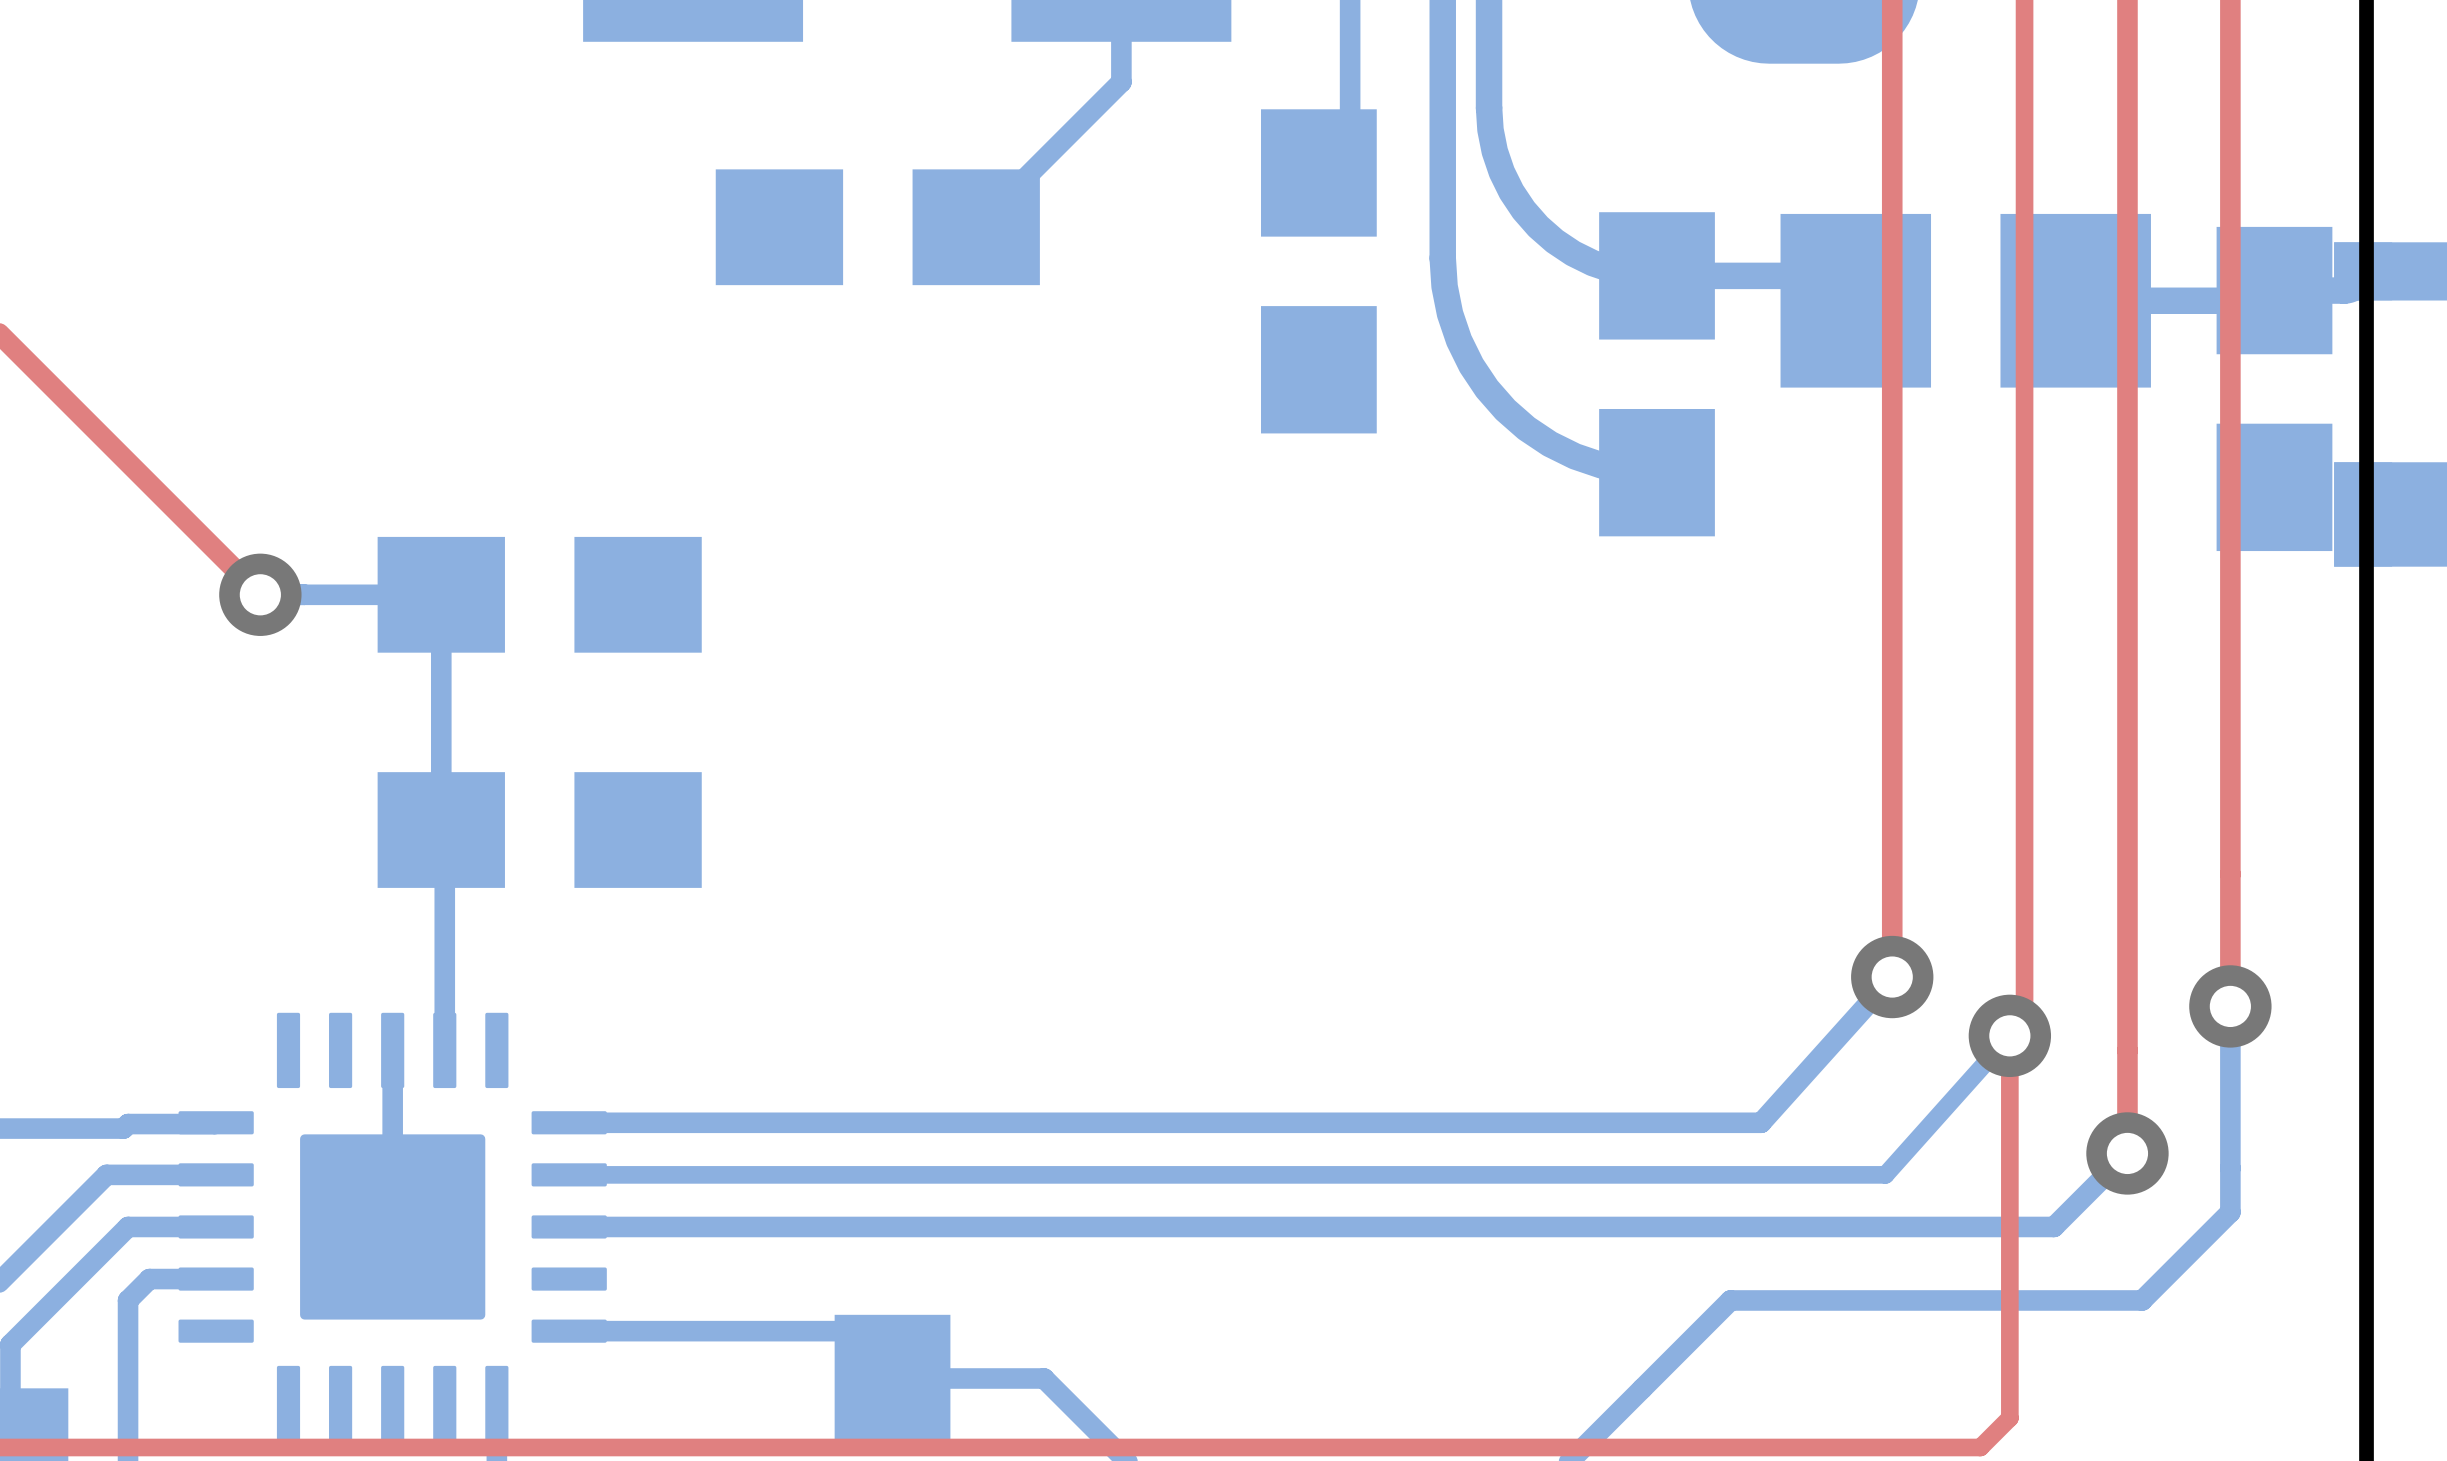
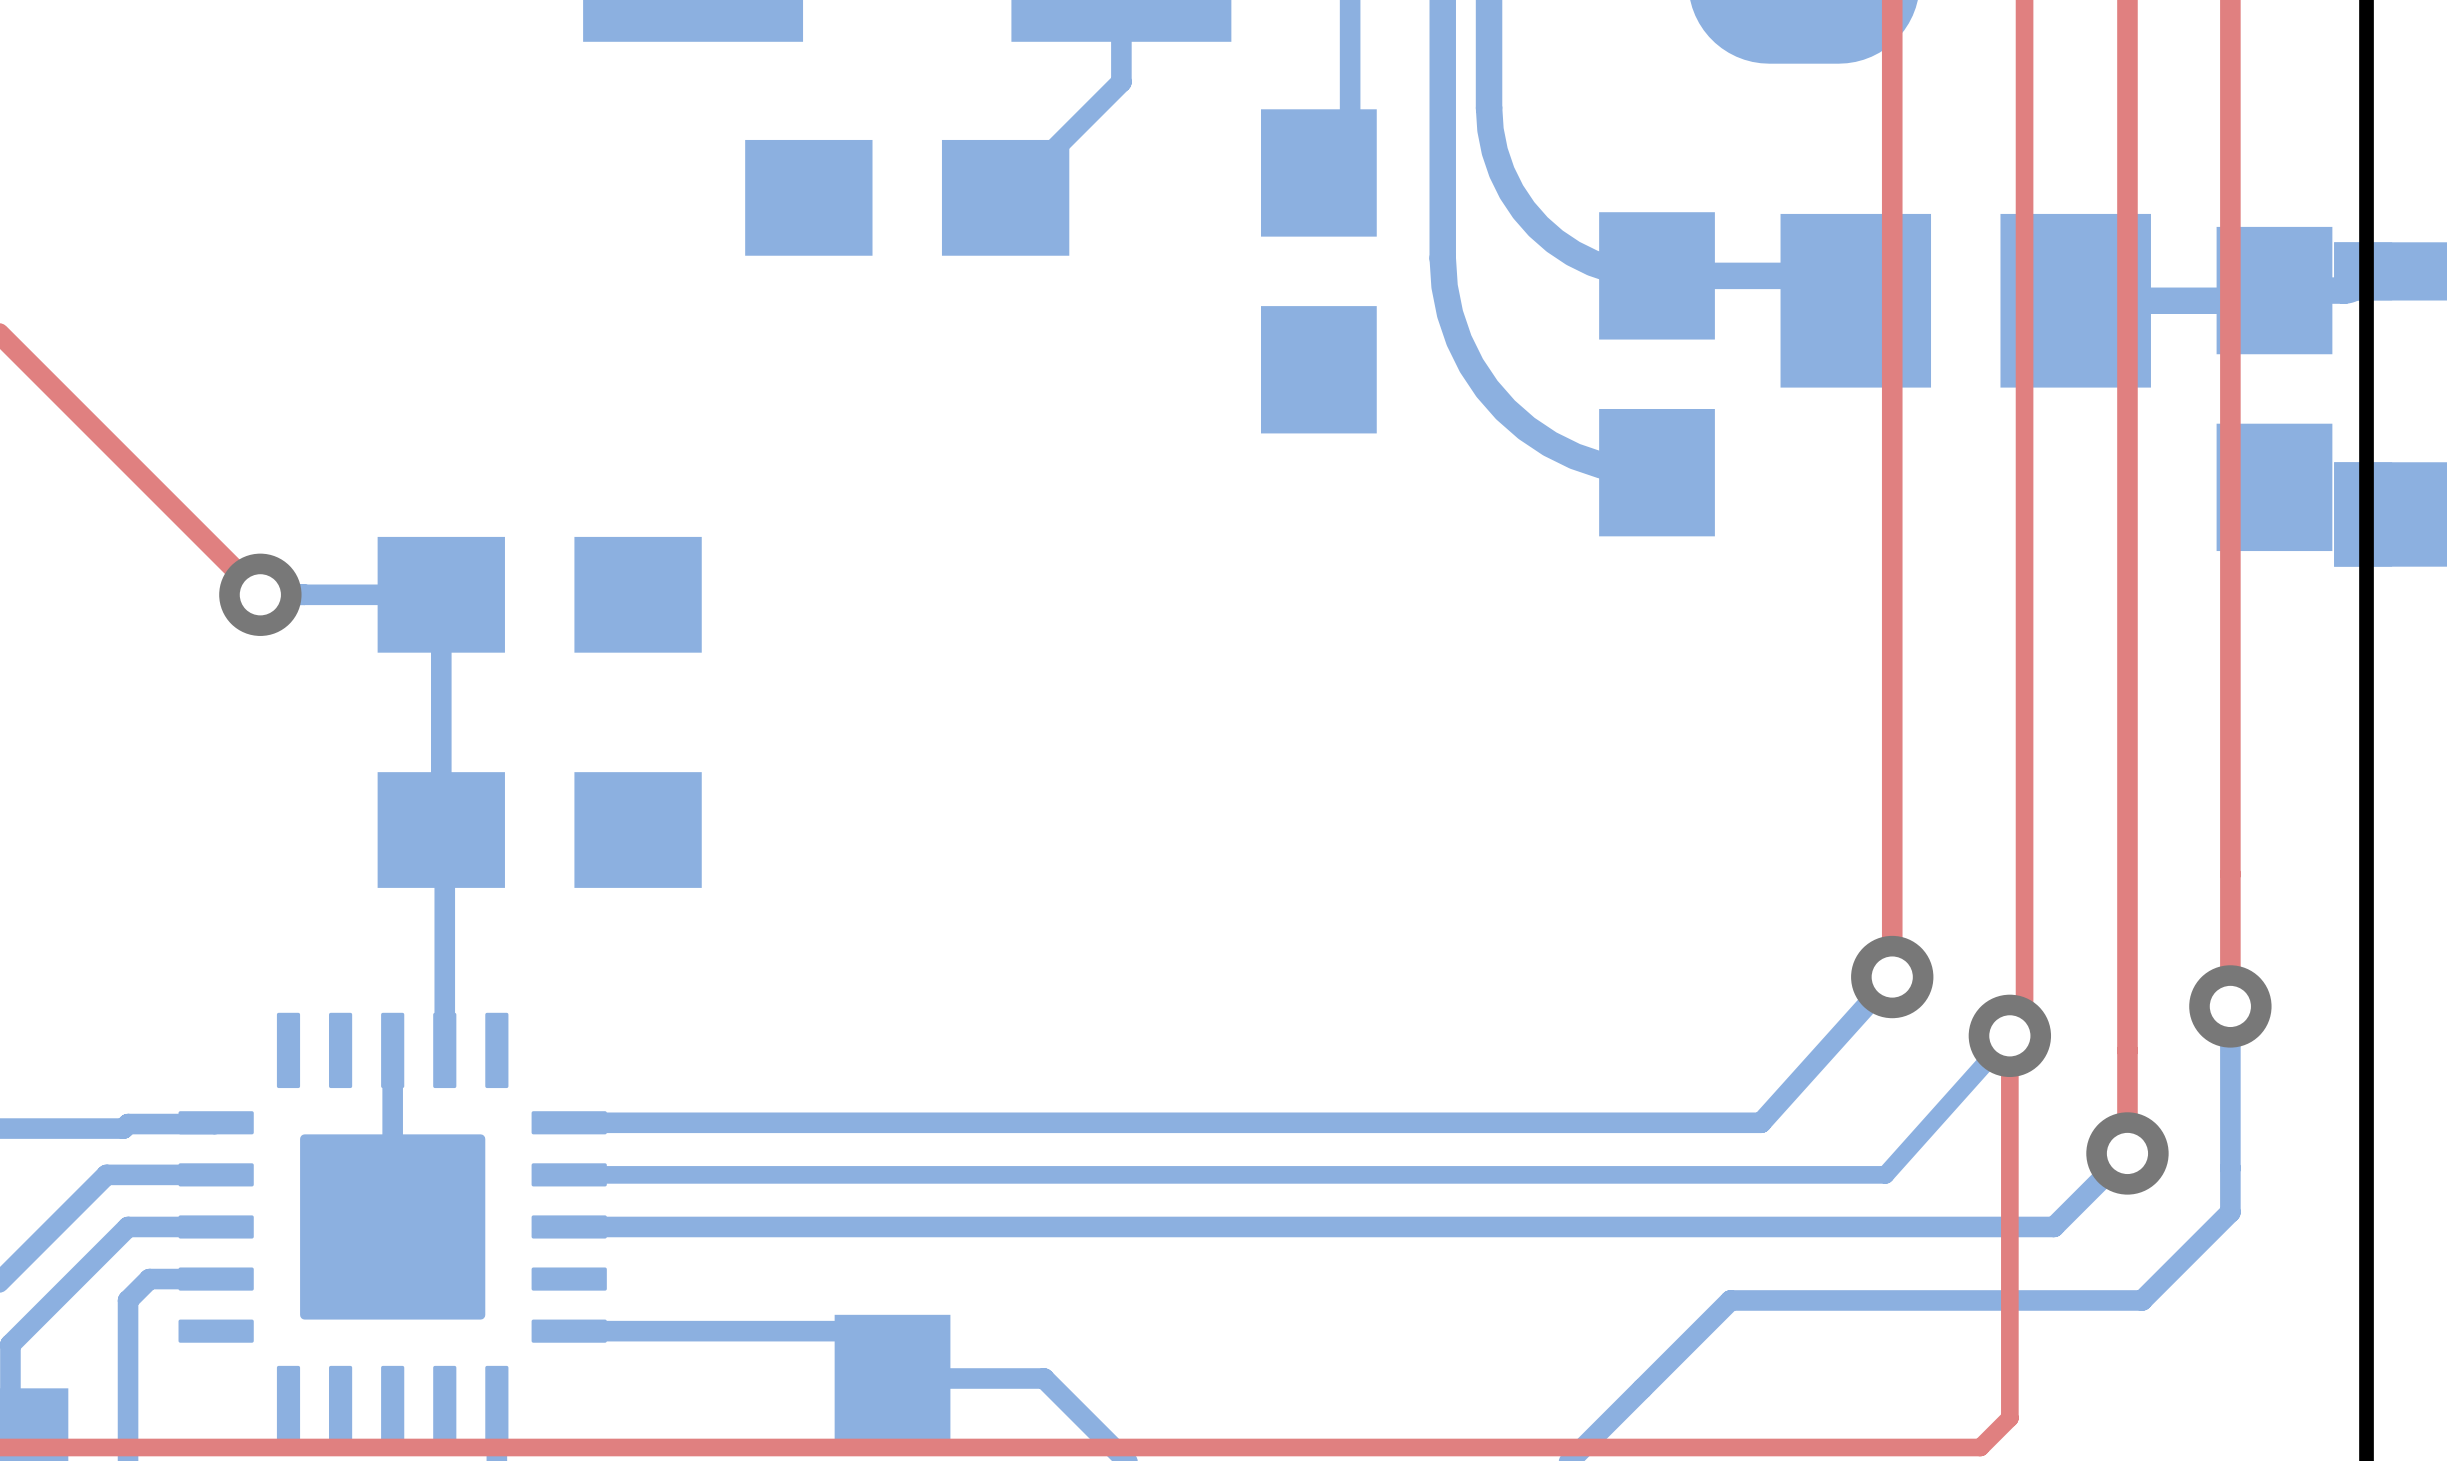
part position: (877, 227) -> (907, 197)

